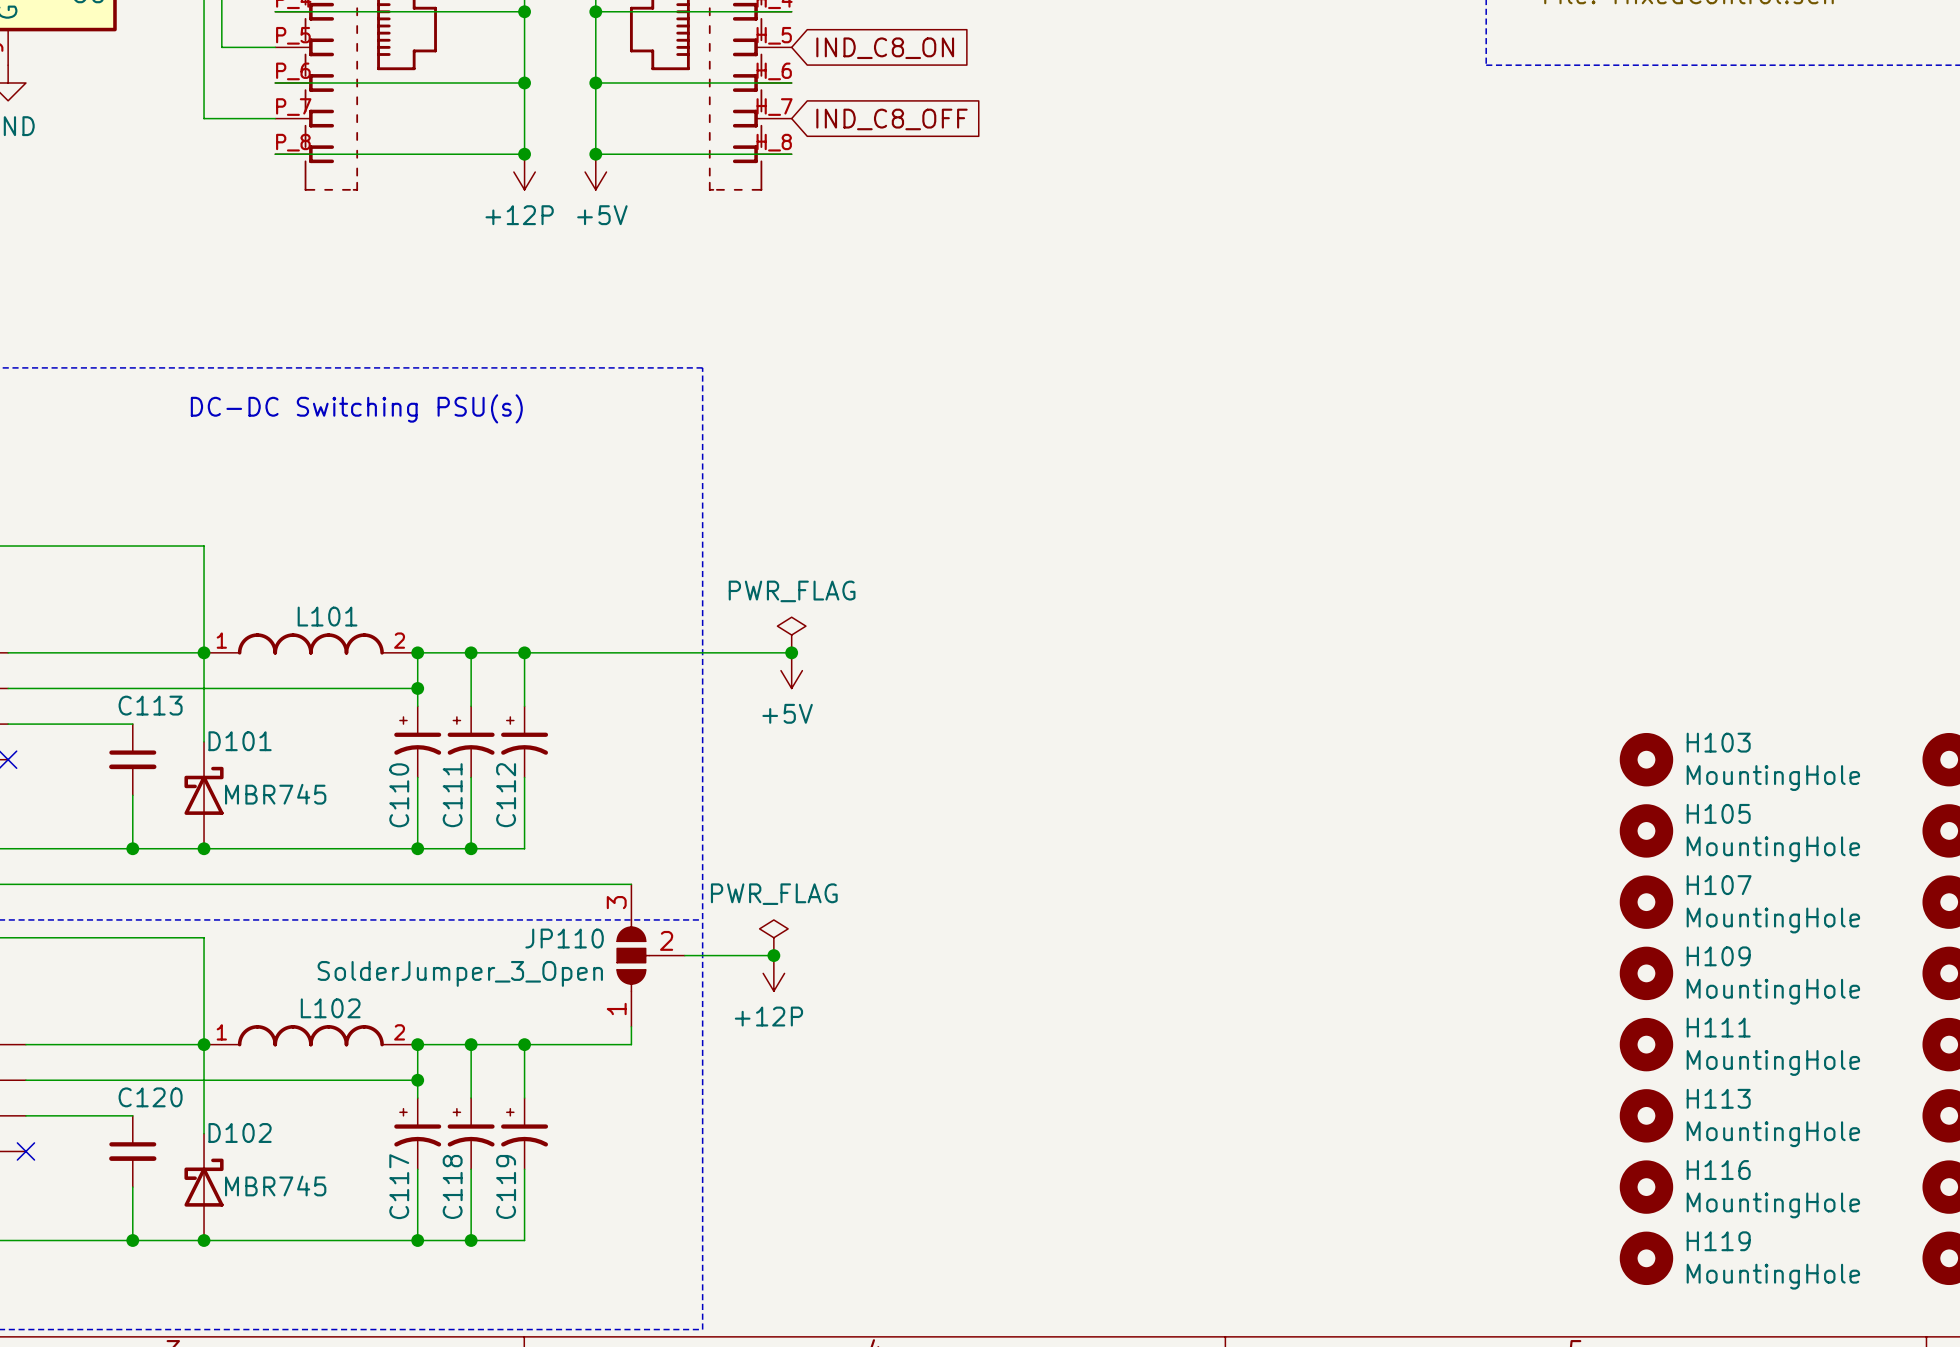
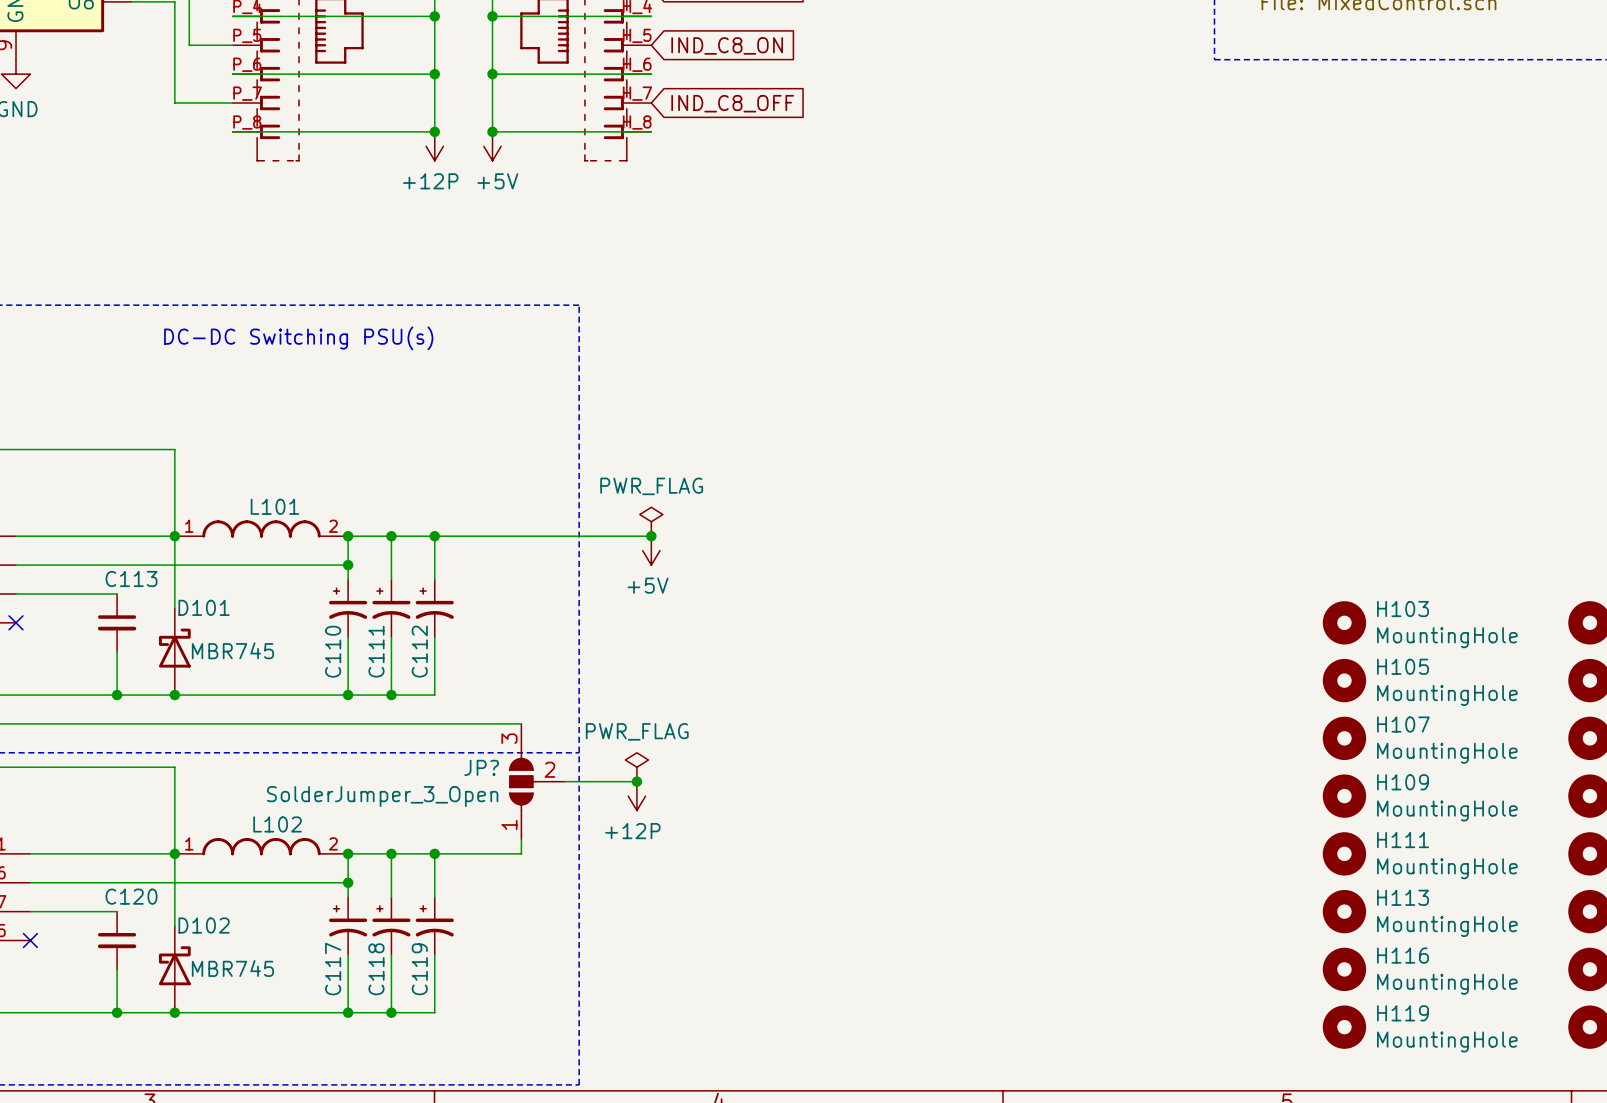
JP110 name: JP110 (564, 938) -> JP? (481, 767)

